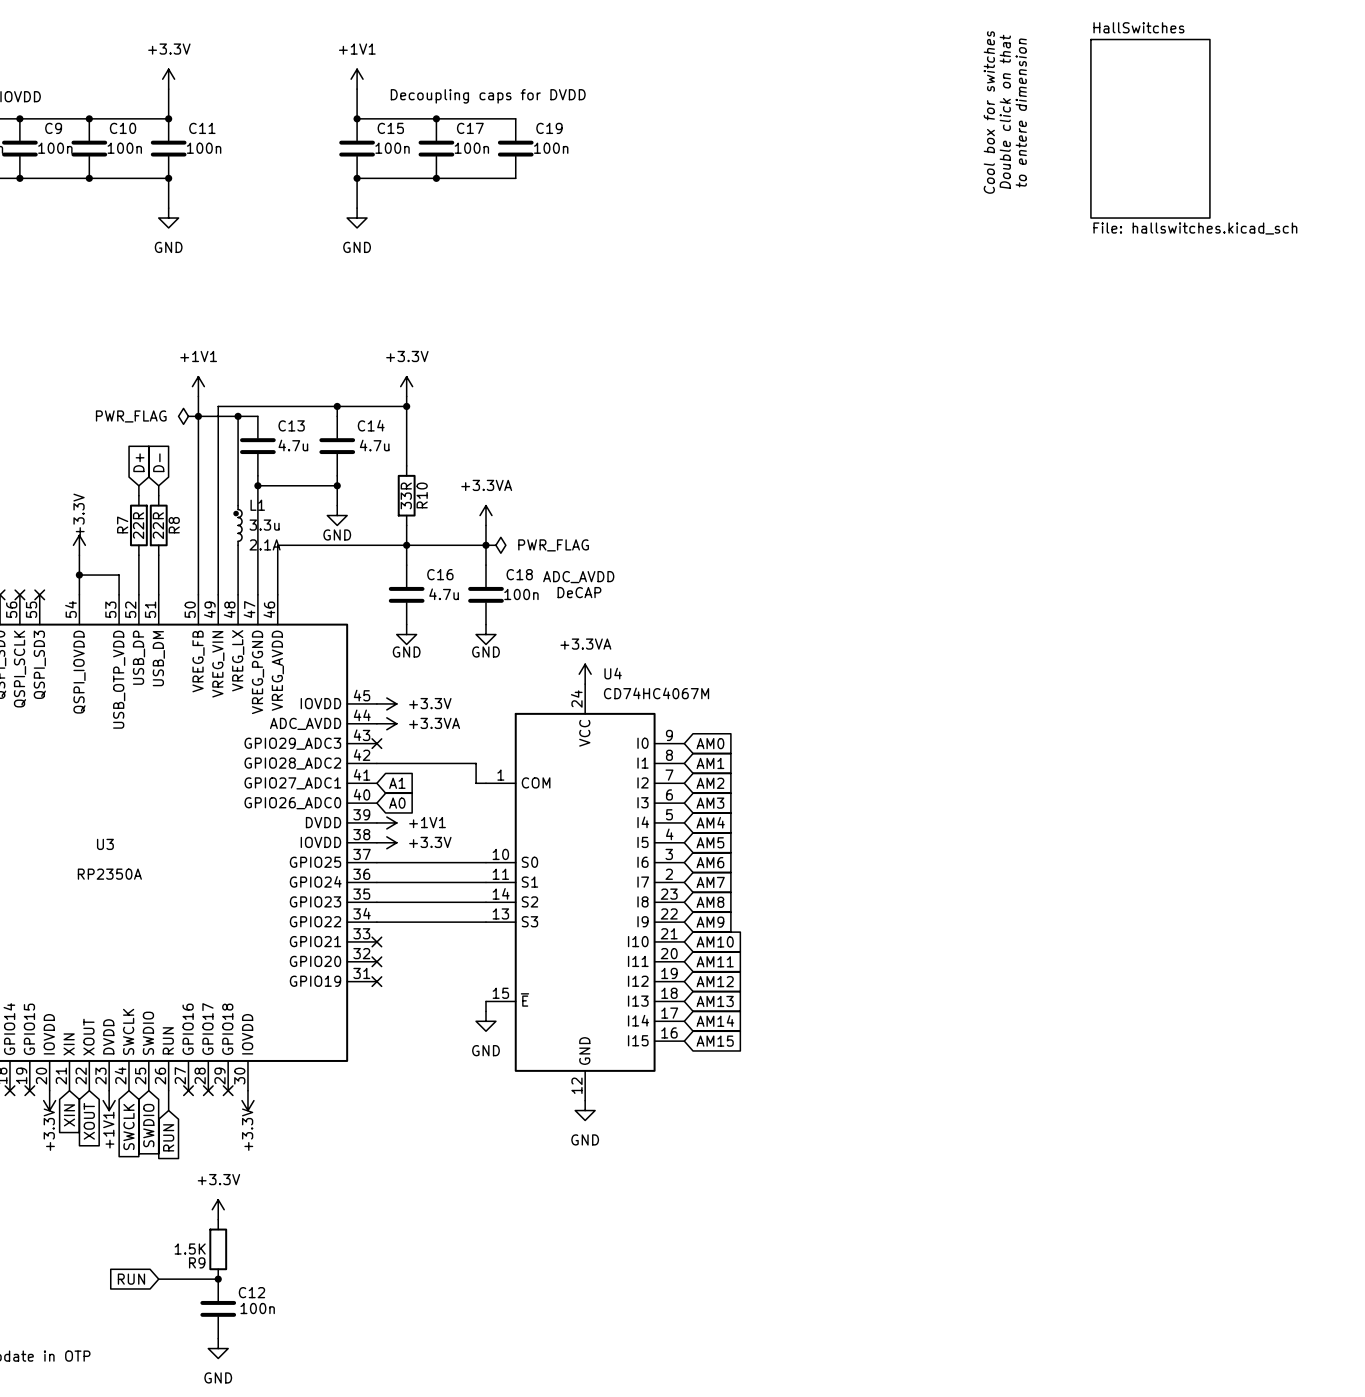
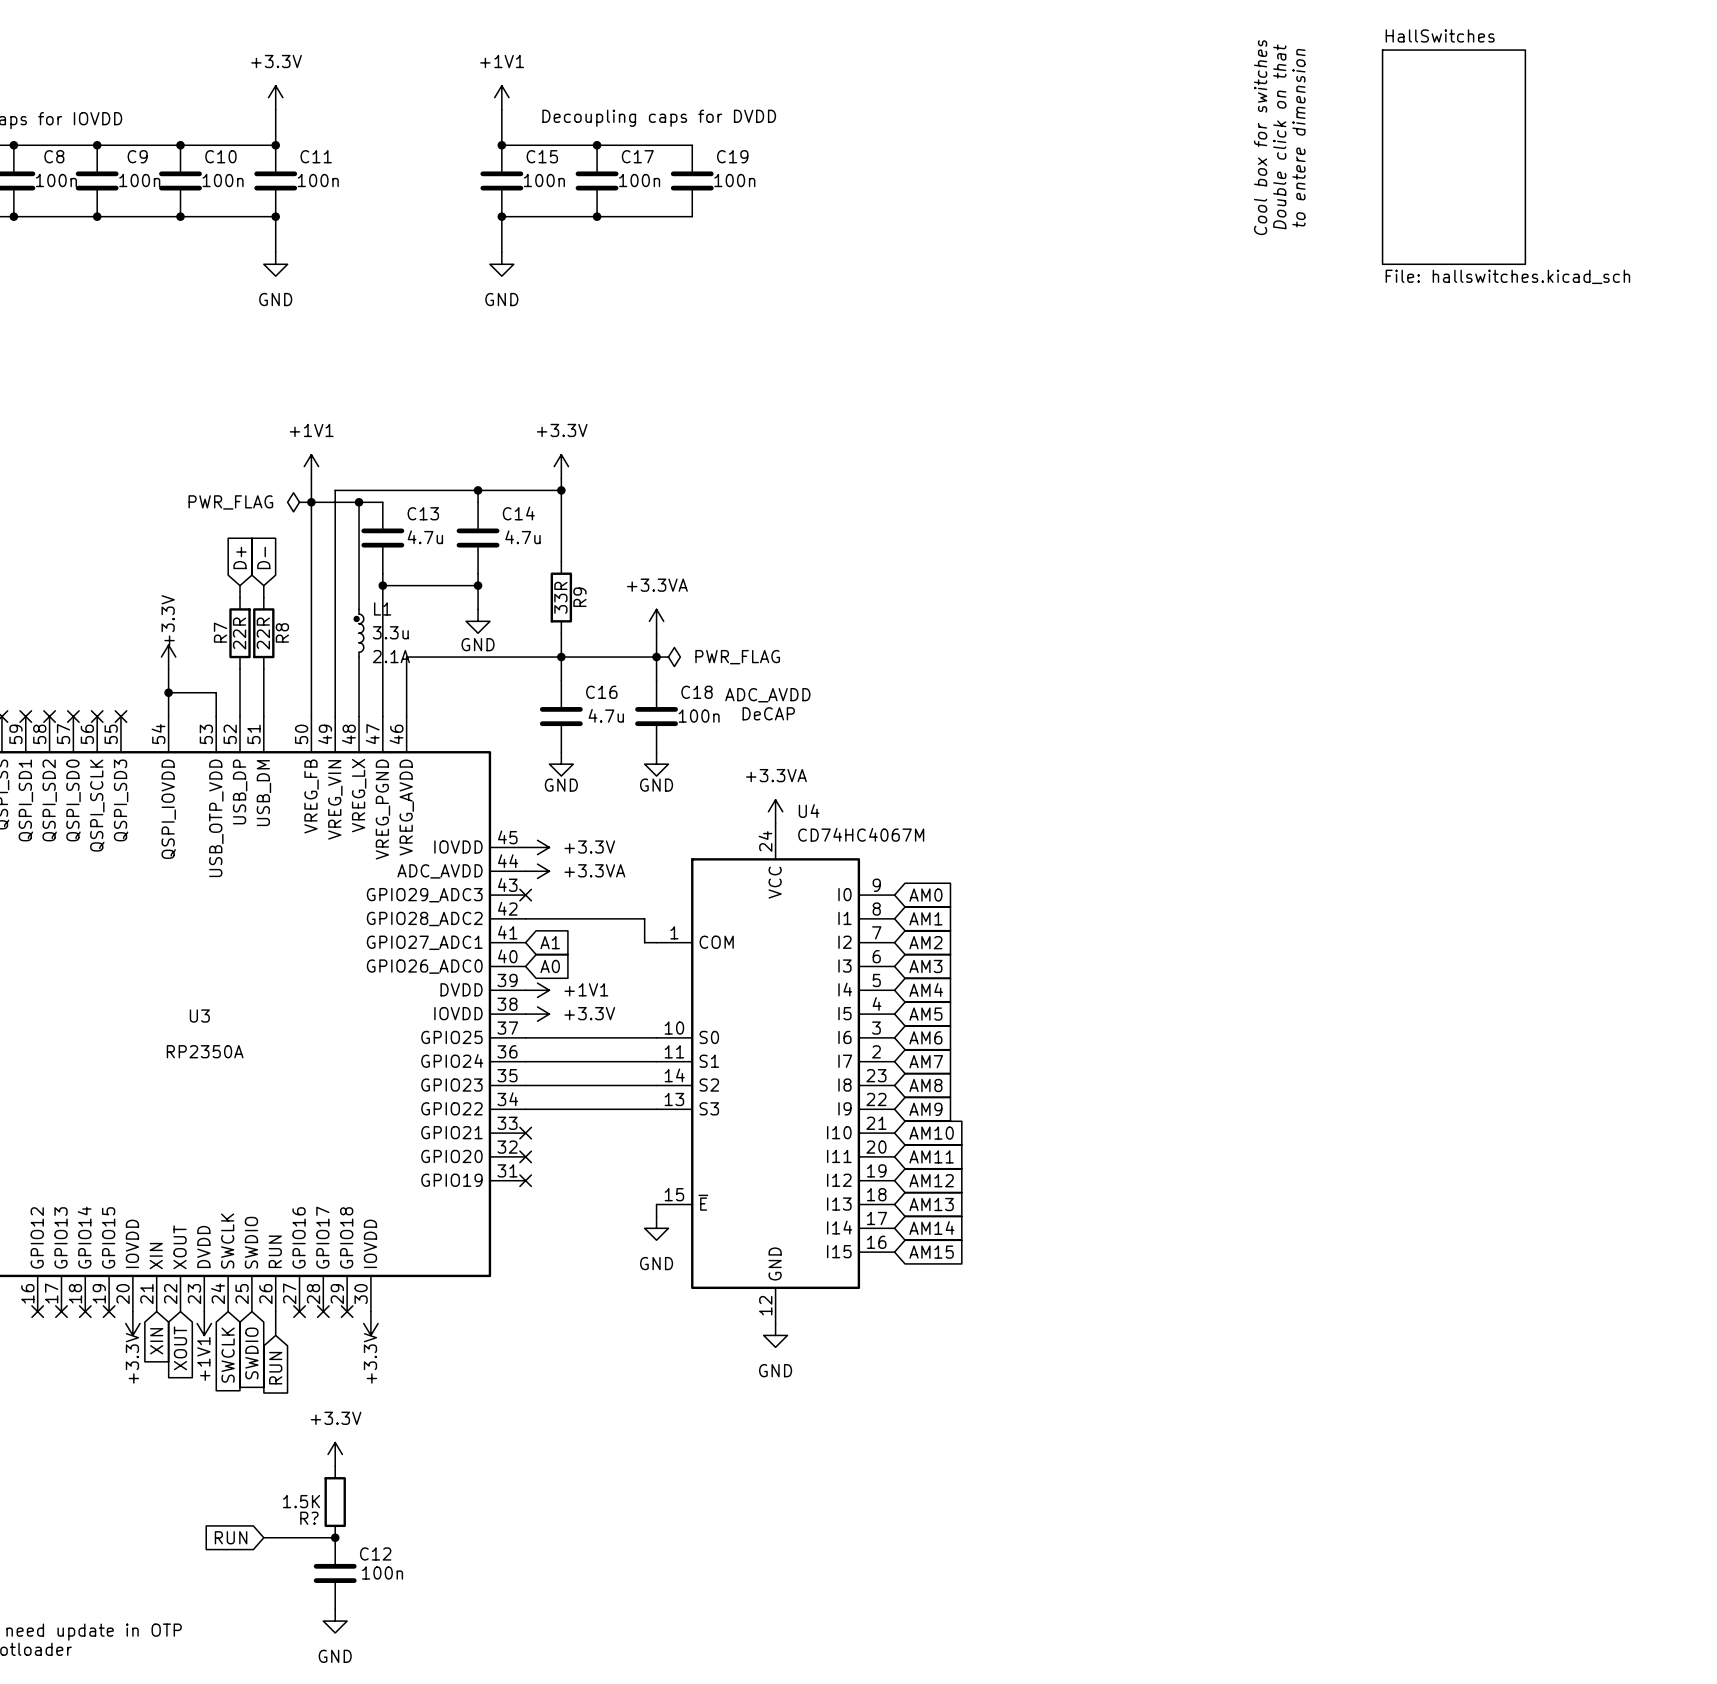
R10 name: R10 (422, 495) -> R9 (579, 597)
R9 name: R9 (197, 1262) -> R? (309, 1518)

